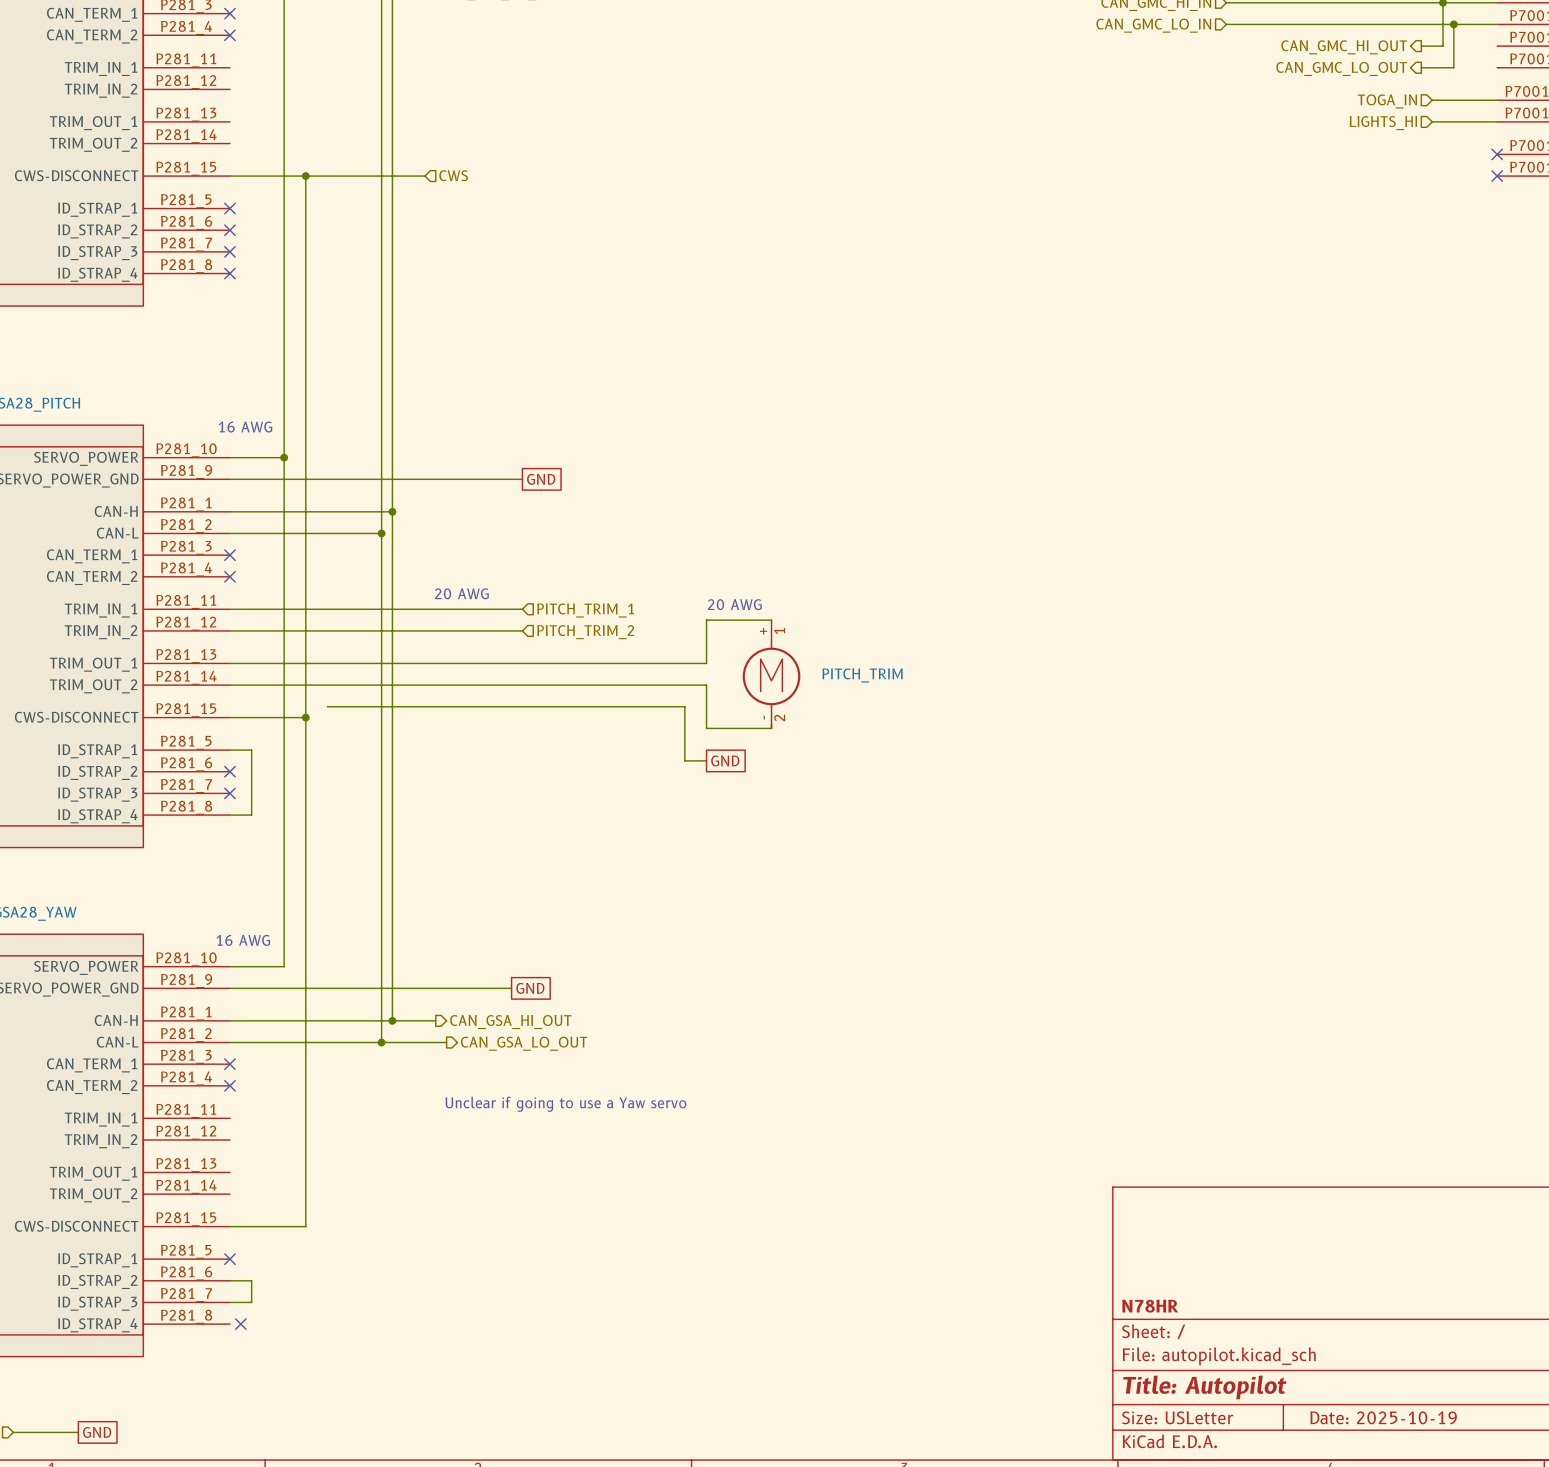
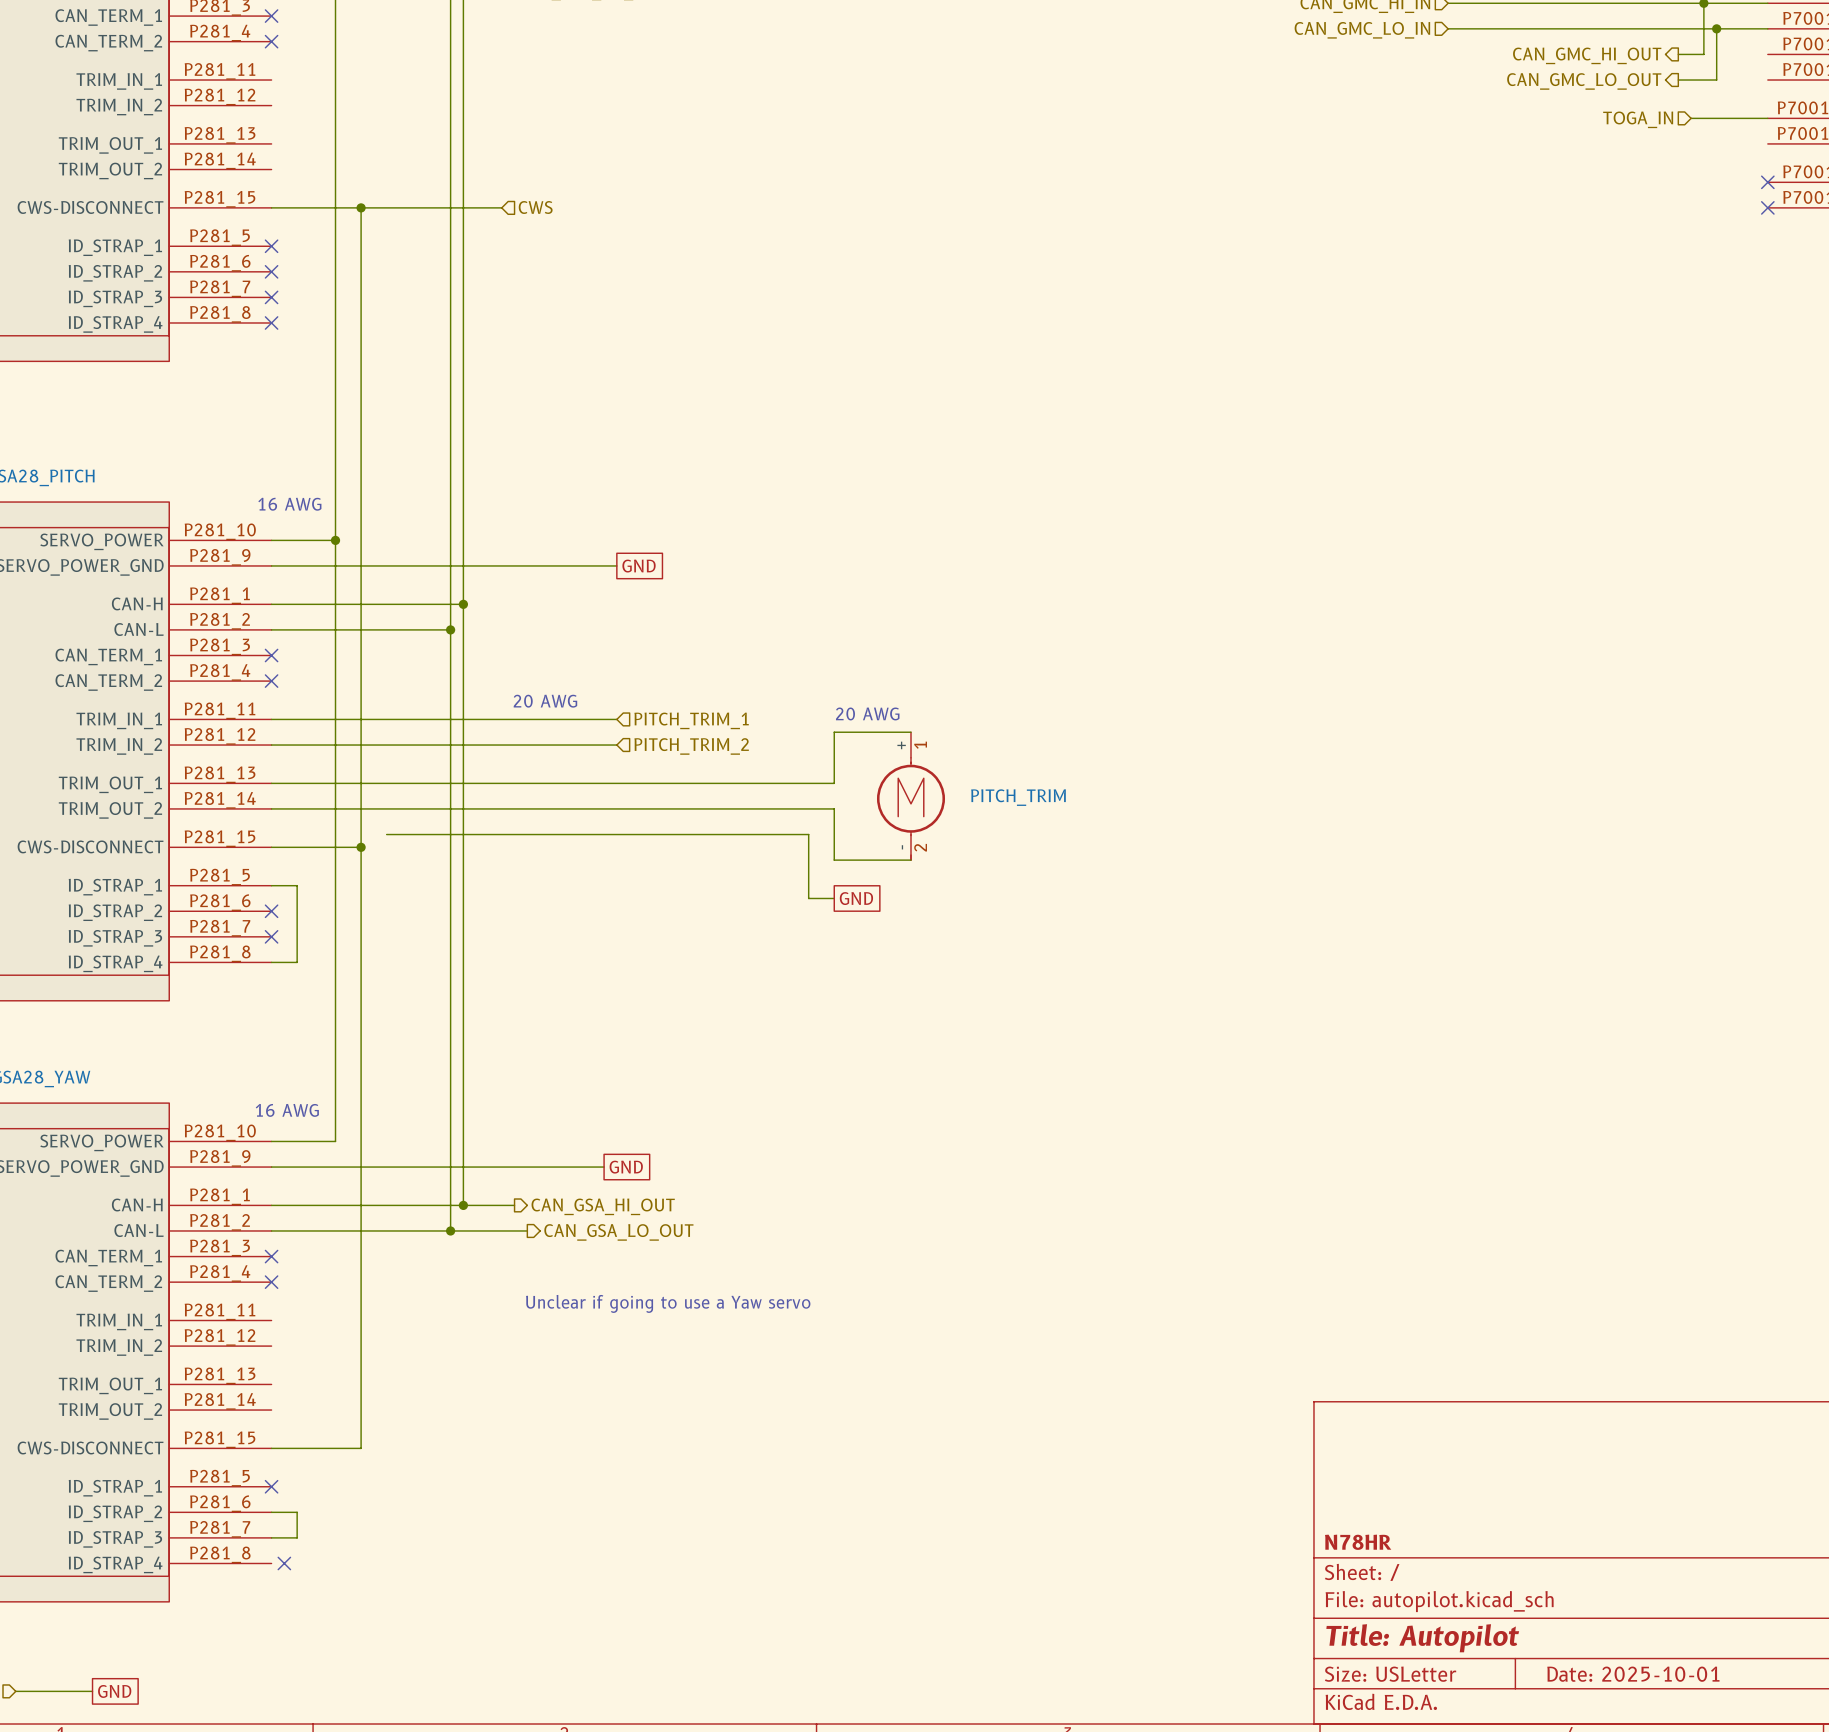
wire: (1432, 121) (1497, 121) -> none
hierarchical label: LIGHTS_HI (1383, 123) -> none
title block: Date: 2025-10-19 (1383, 1417) -> Date: 2025-10-01 (1633, 1674)

